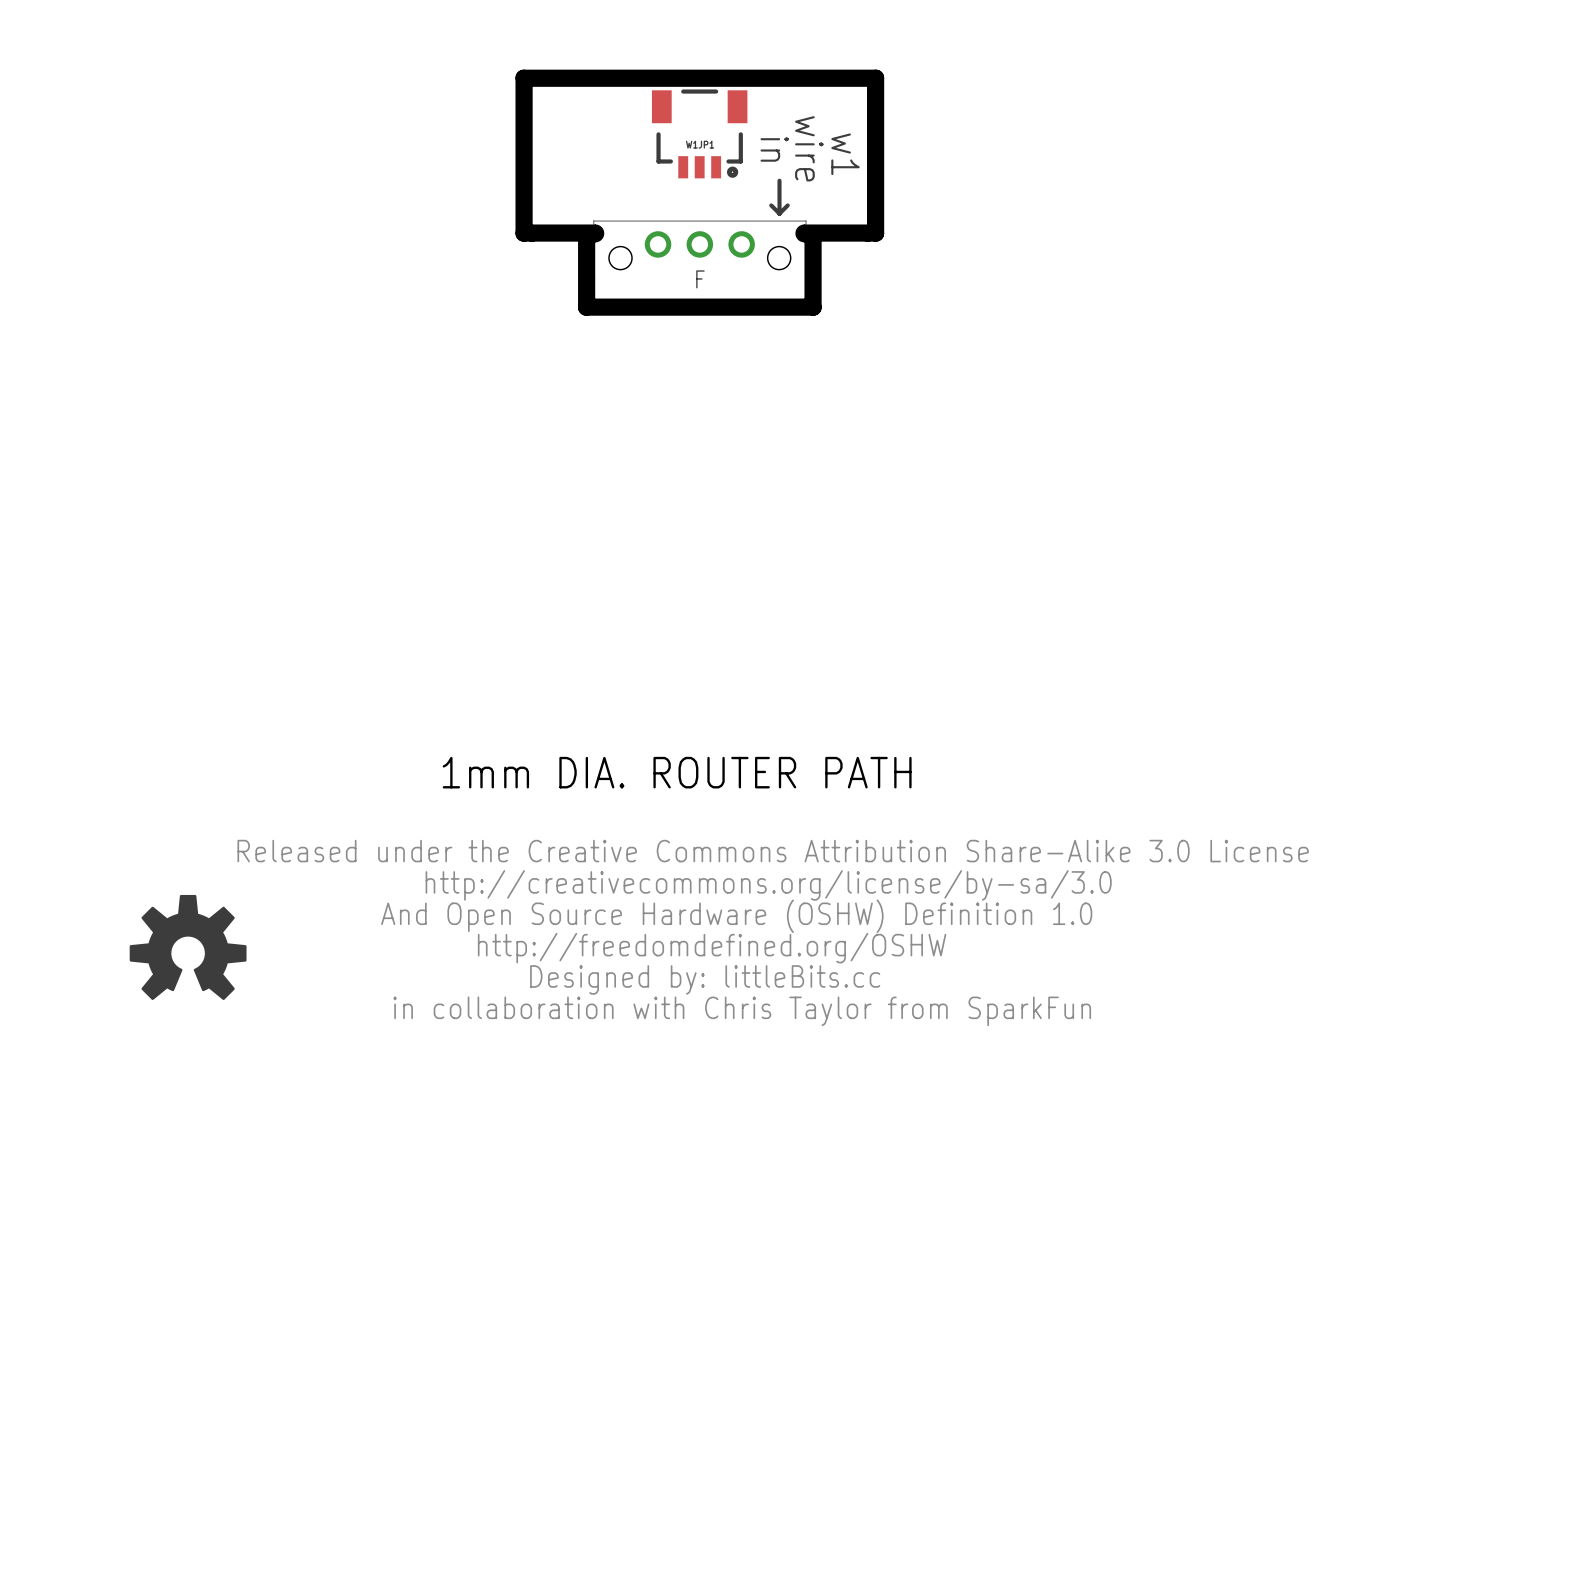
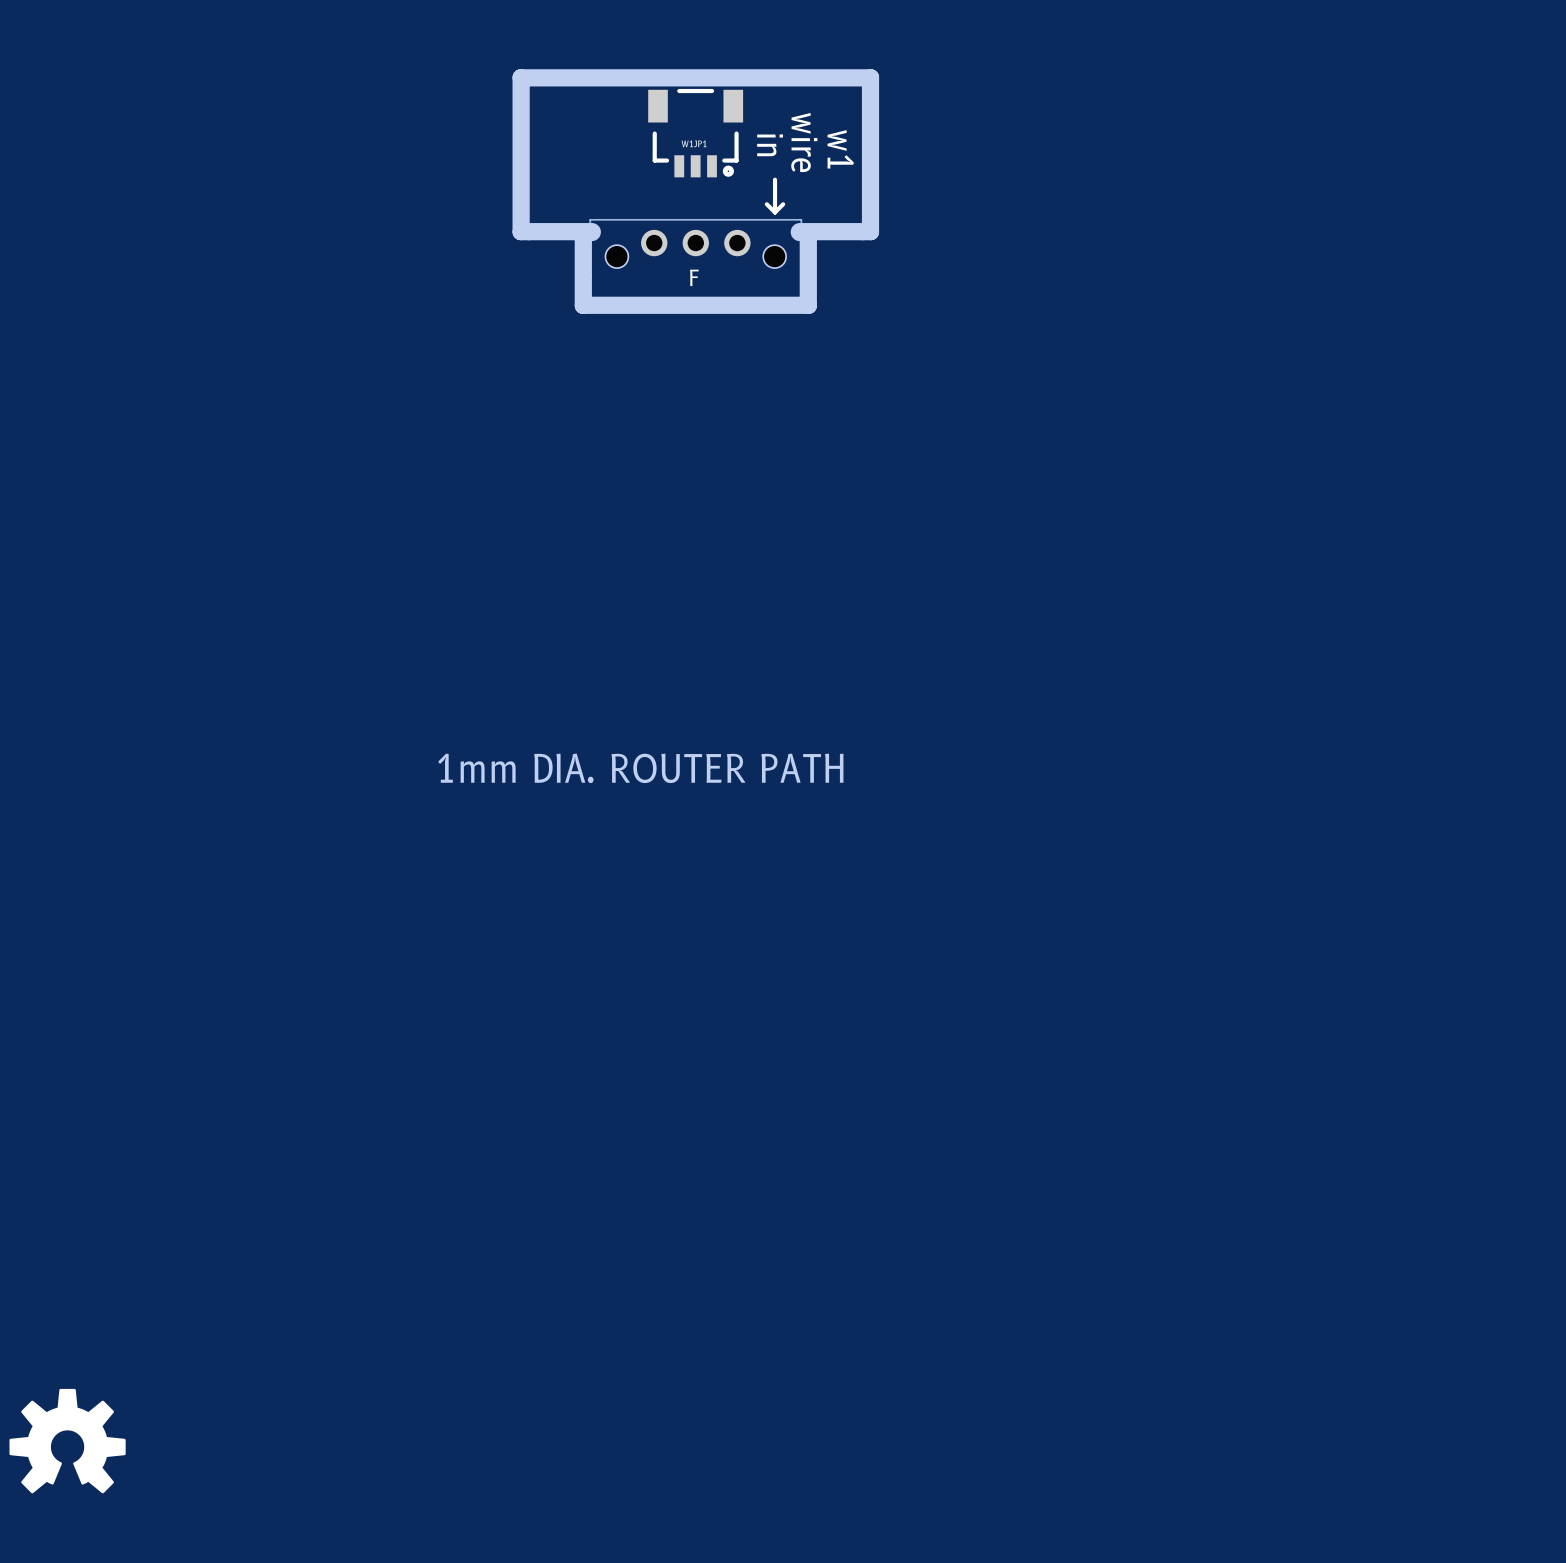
drawing: [129, 894, 247, 1000] -> none
drawing: none -> [9, 1388, 126, 1494]

